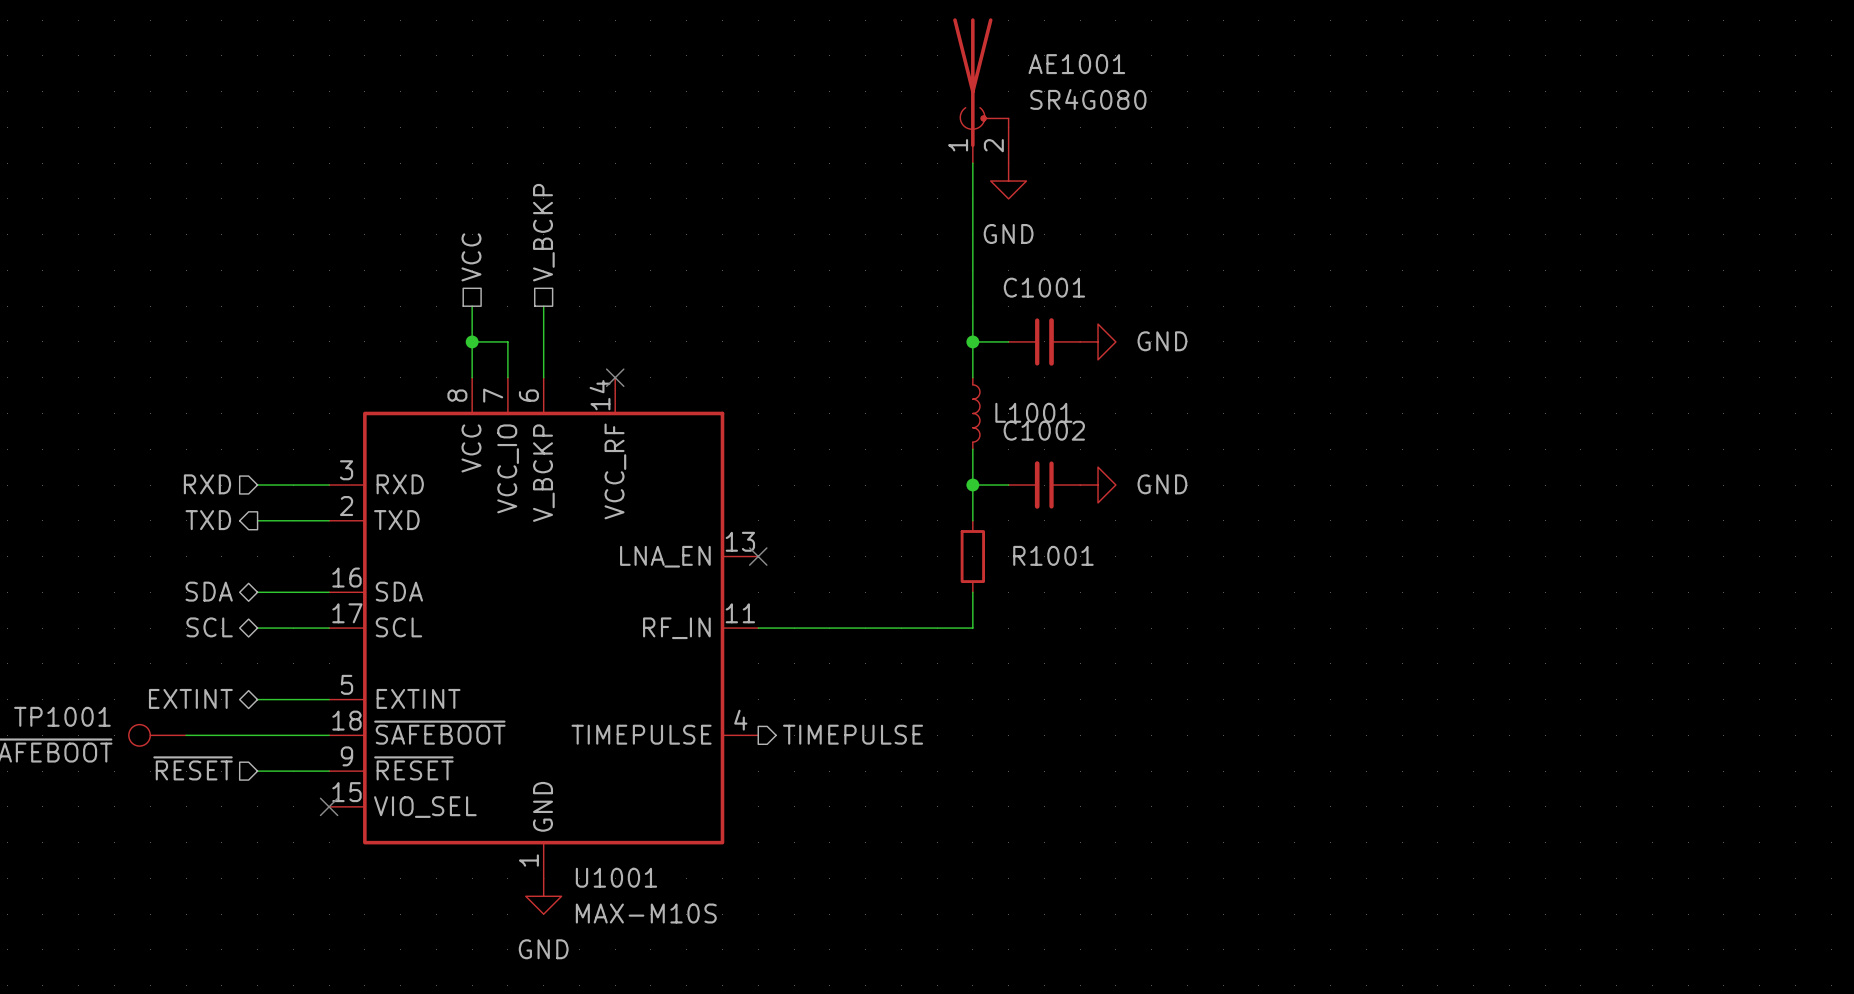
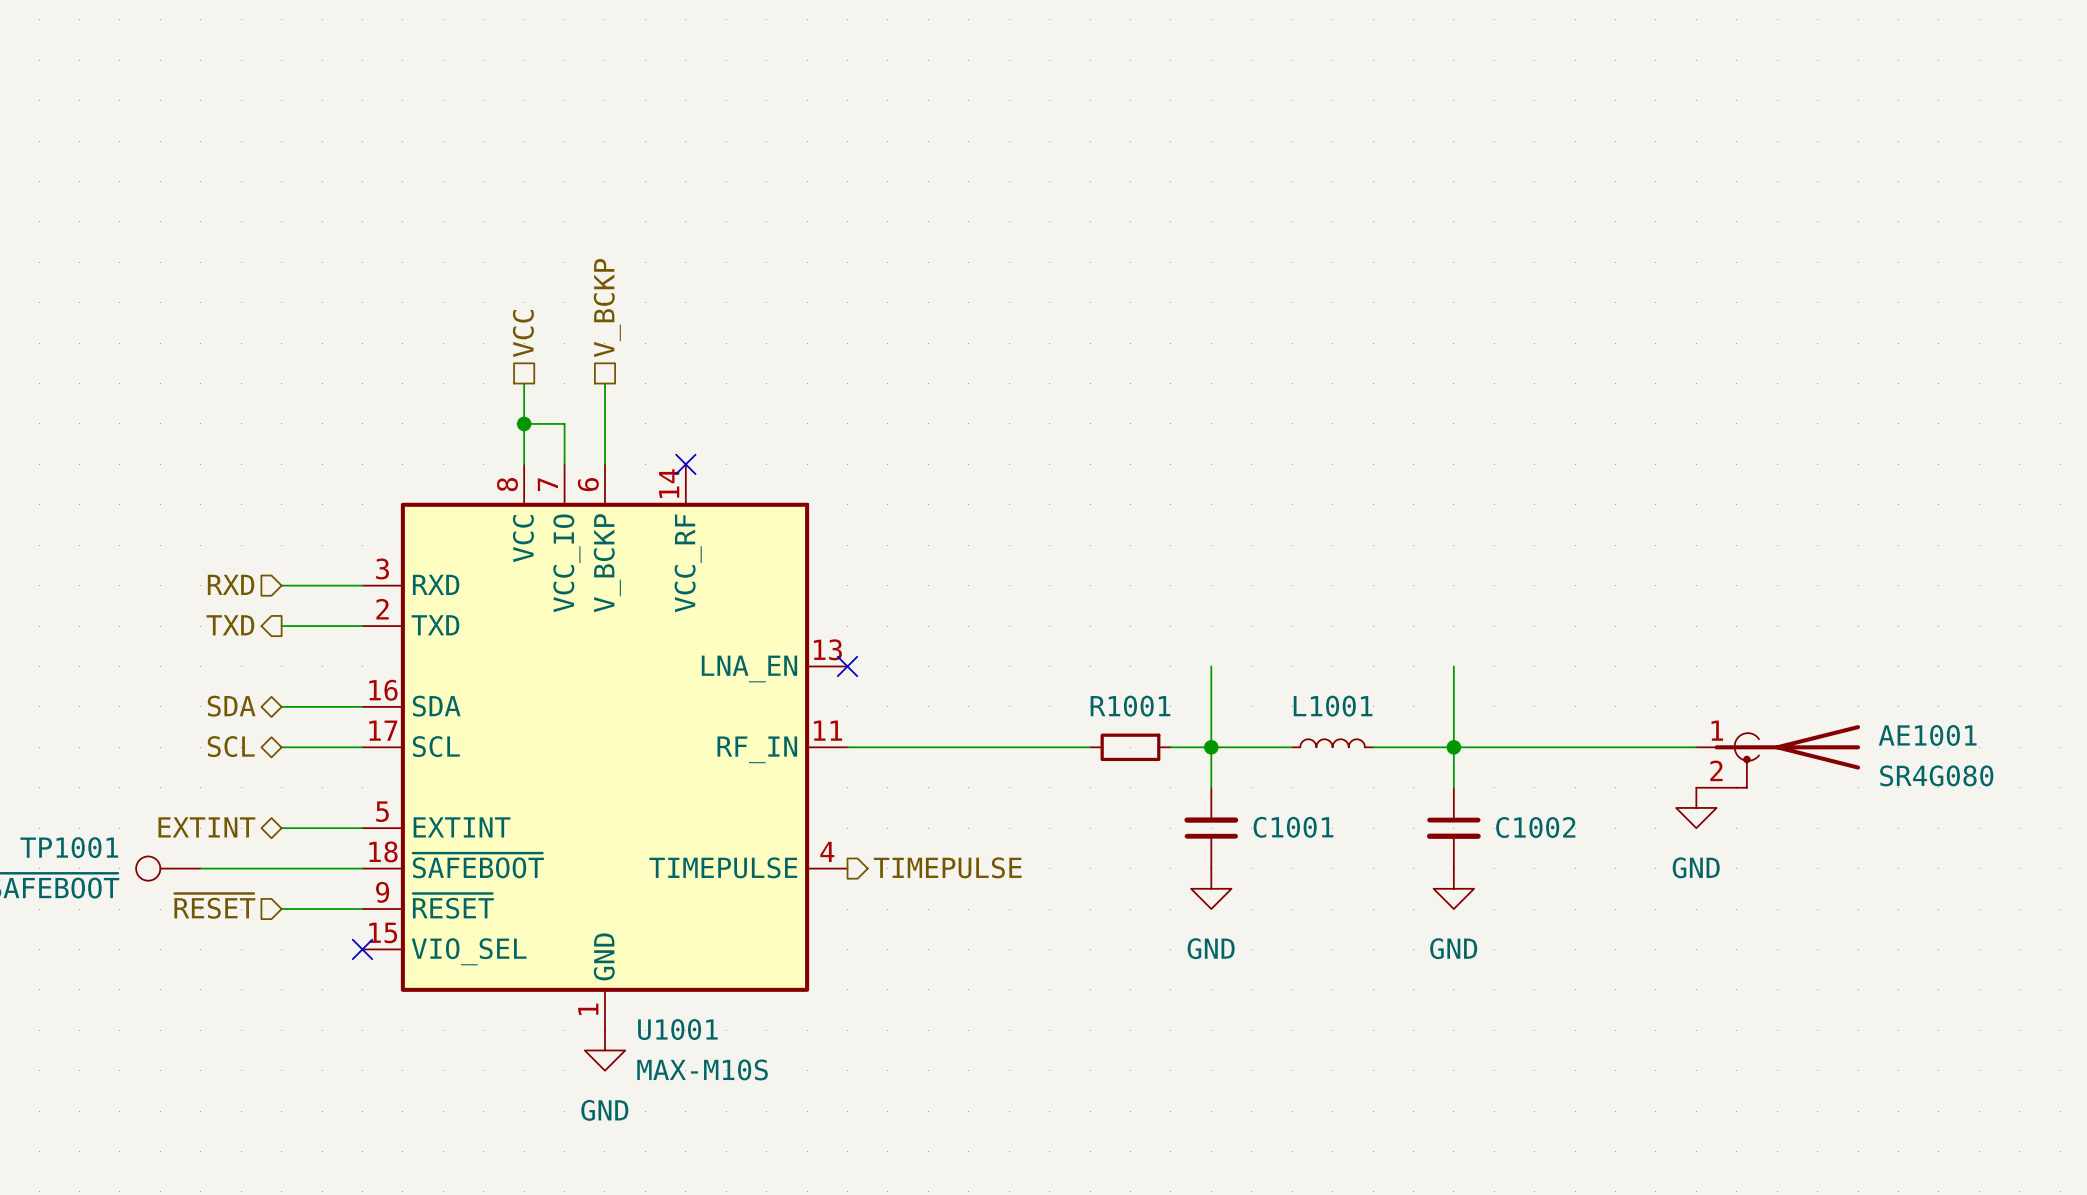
AE1001 name position: AE1001 (1076, 64) -> AE1001 (1927, 735)
AE1001 rotation: 0° (980, 82) -> 90° clockwise (1787, 756)
AE1001 position: (980, 90) -> (1778, 756)
AE1001 value position: SR4G080 (1088, 99) -> SR4G080 (1936, 775)
wire: (972, 163) (972, 377) -> none
power symbol: GND (1008, 181) -> none
C1001 name position: C1001 (1044, 287) -> C1001 (1293, 827)
wire: (972, 341) (1008, 341) -> none
junction: (972, 341) -> none
C1001 rotation: 0° (1044, 341) -> 90° counterclockwise (1211, 828)
C1001 position: (1044, 341) -> (1211, 828)
power symbol: GND (1098, 341) -> none
L1001 name position: L1001 (1033, 412) -> L1001 (1333, 706)
L1001 rotation: 0° (976, 413) -> 90° counterclockwise (1332, 743)
L1001 position: (976, 413) -> (1332, 743)
C1002 name position: C1002 (1044, 430) -> C1002 (1535, 827)
wire: (972, 449) (972, 520) -> none
wire: (972, 485) (1008, 485) -> none
junction: (972, 485) -> none
C1002 rotation: 0° (1044, 485) -> 90° counterclockwise (1453, 828)
C1002 position: (1044, 485) -> (1453, 828)
power symbol: GND (1098, 485) -> none
R1001 name position: R1001 (1053, 555) -> R1001 (1130, 706)
R1001 rotation: 0° (972, 556) -> 90° clockwise (1130, 747)
R1001 position: (972, 556) -> (1130, 747)
wire: none -> (1211, 666) (1211, 787)
wire: none -> (1453, 666) (1453, 787)
wire: (972, 592) (972, 628) -> none
wire: none -> (1170, 747) (1292, 747)
junction: none -> (1211, 747)
wire: none -> (1373, 747) (1696, 747)
junction: none -> (1453, 747)
power symbol: none -> GND (1696, 807)
power symbol: none -> GND (1211, 888)
power symbol: none -> GND (1453, 888)

